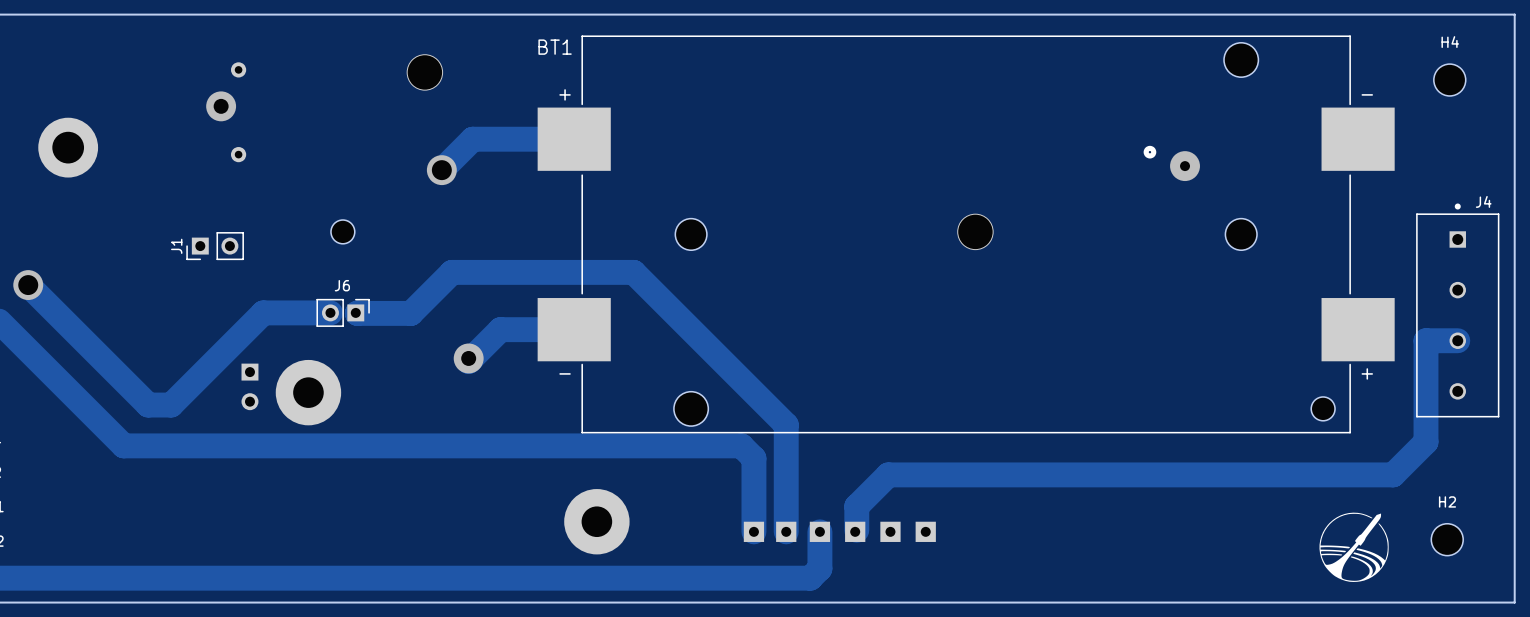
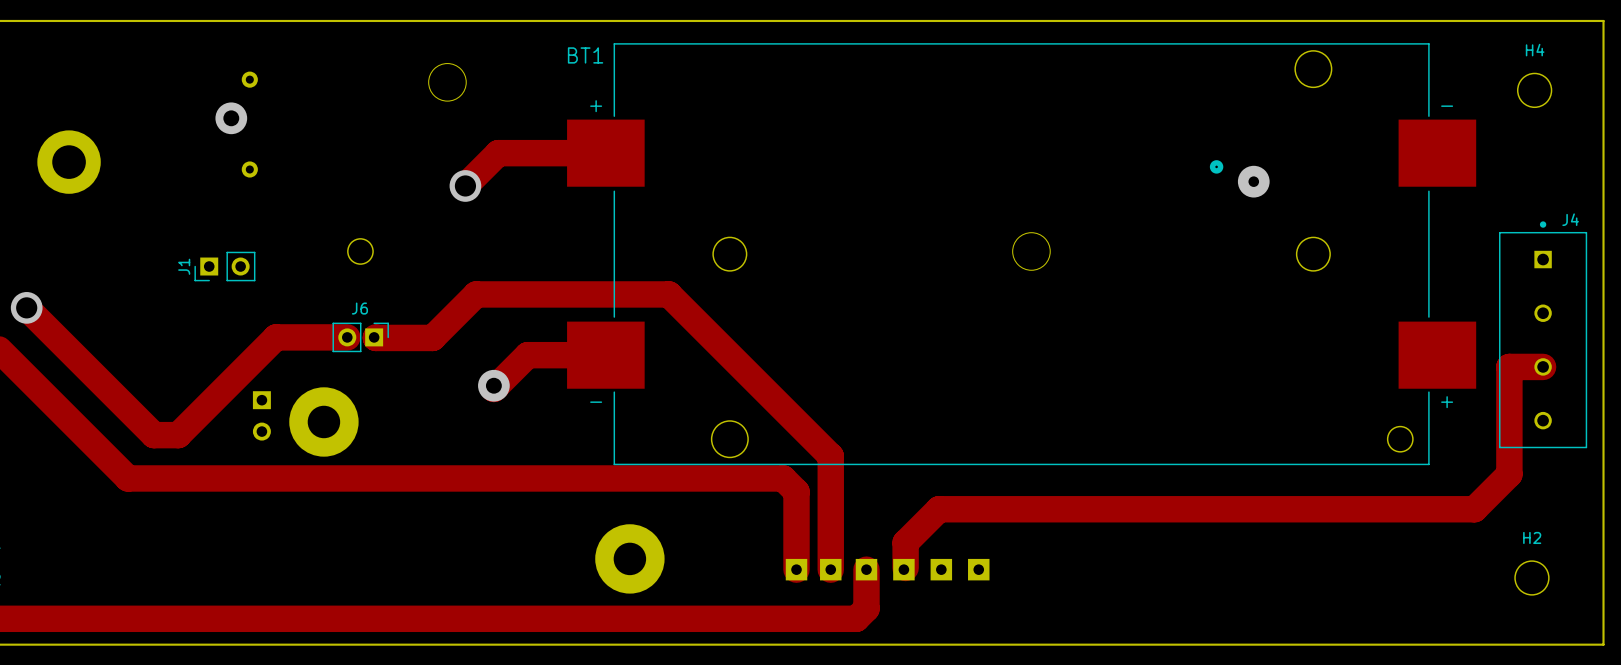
drawing: [1319, 512, 1389, 582] -> none

